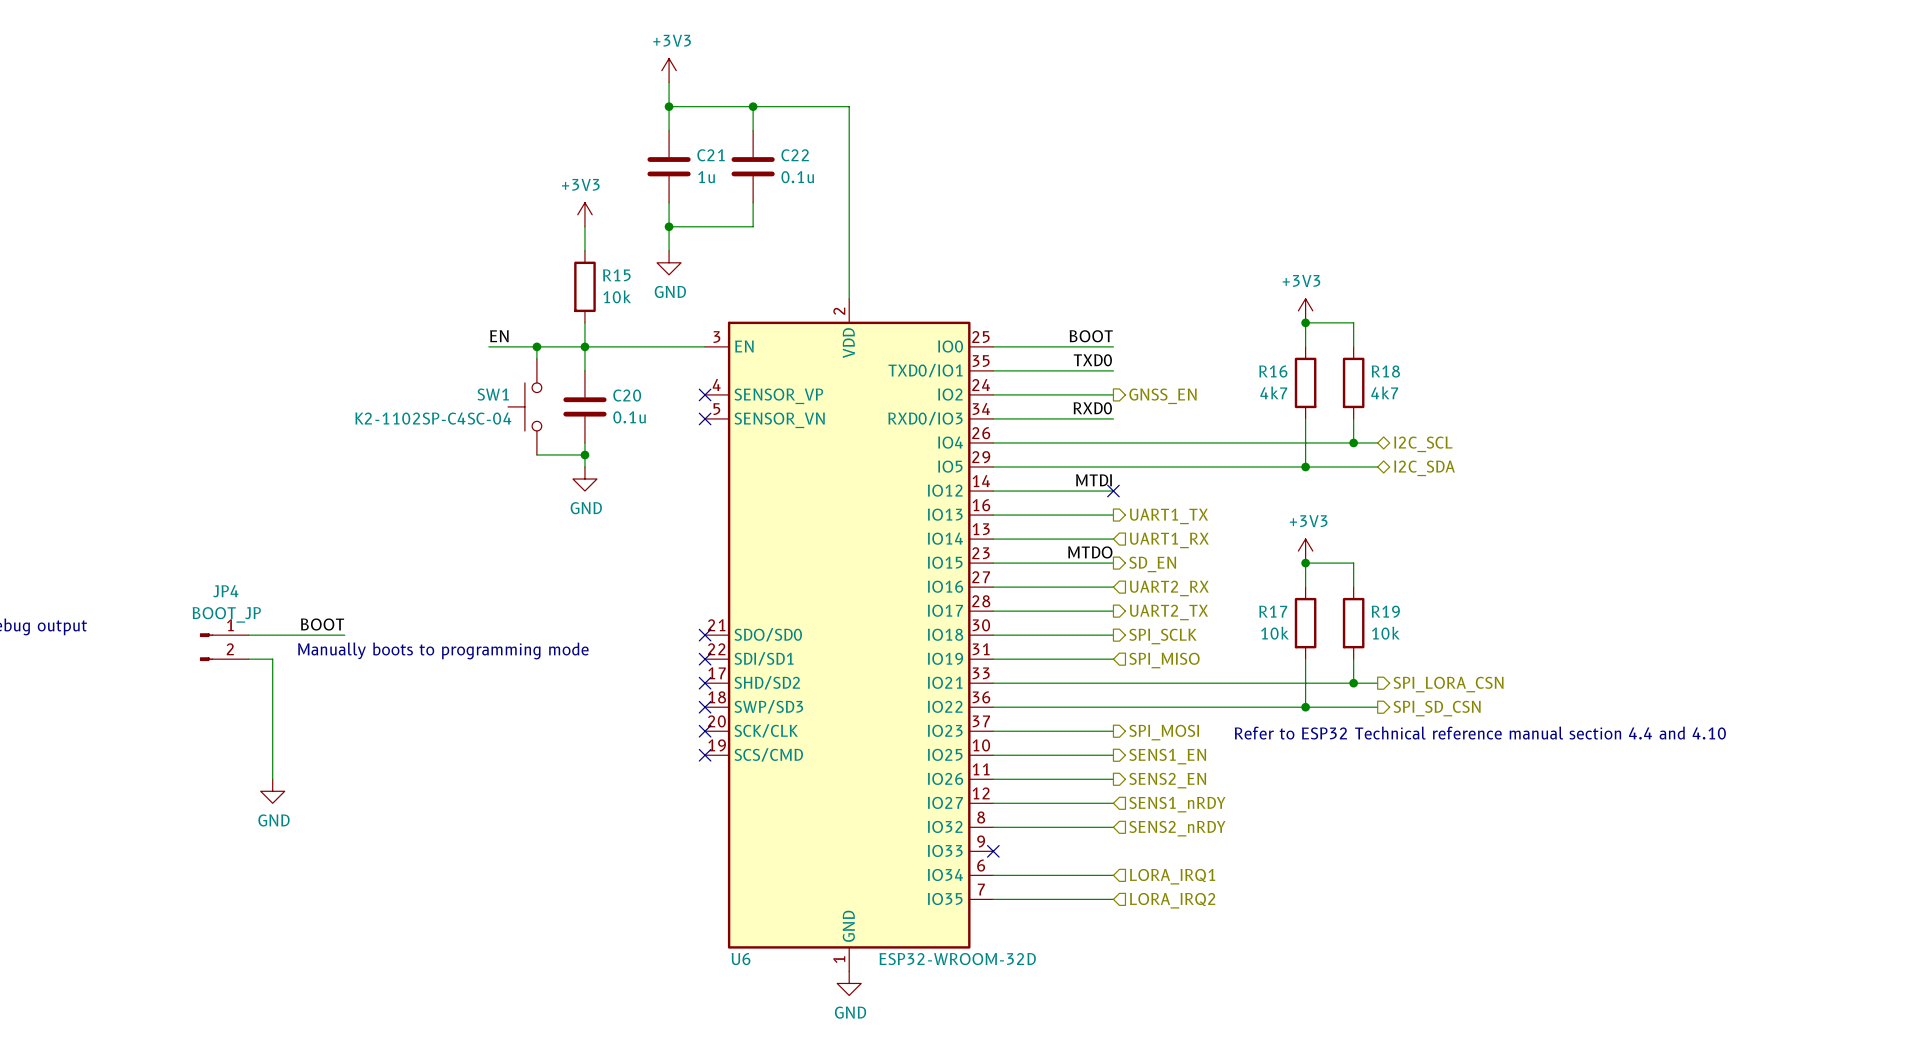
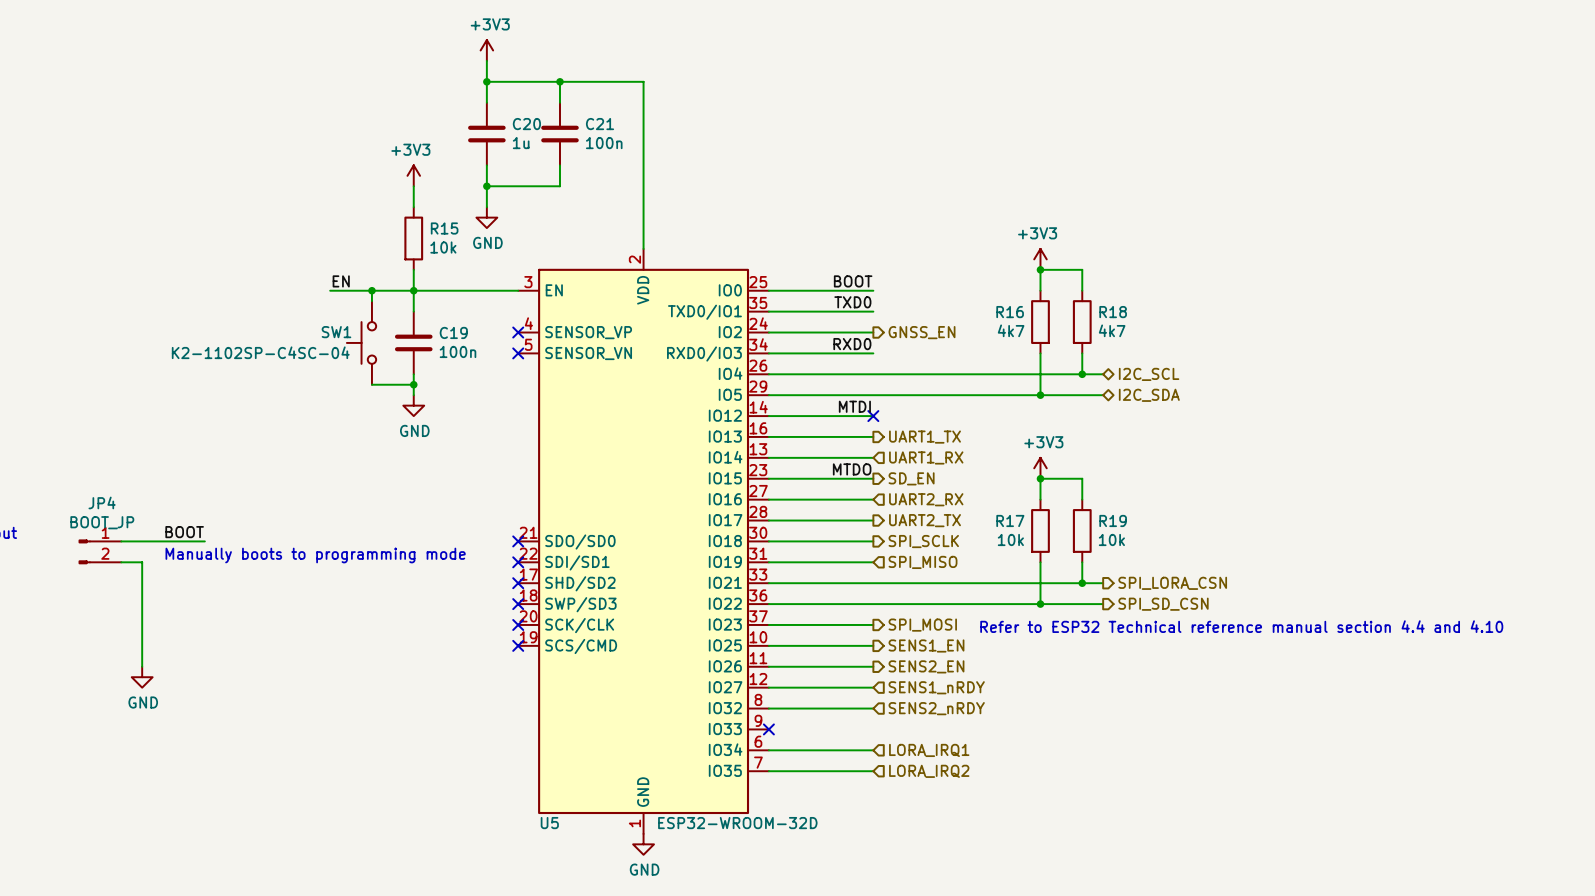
C21 name: C21 (711, 155) -> C20 (526, 124)
C22 name: C22 (795, 155) -> C21 (600, 124)
C22 value: 0.1u (797, 177) -> 100n (604, 143)
C20 name: C20 (627, 395) -> C19 (453, 332)
C20 value: 0.1u (629, 417) -> 100n (458, 351)
U6 name: U6 (741, 959) -> U5 (549, 823)

